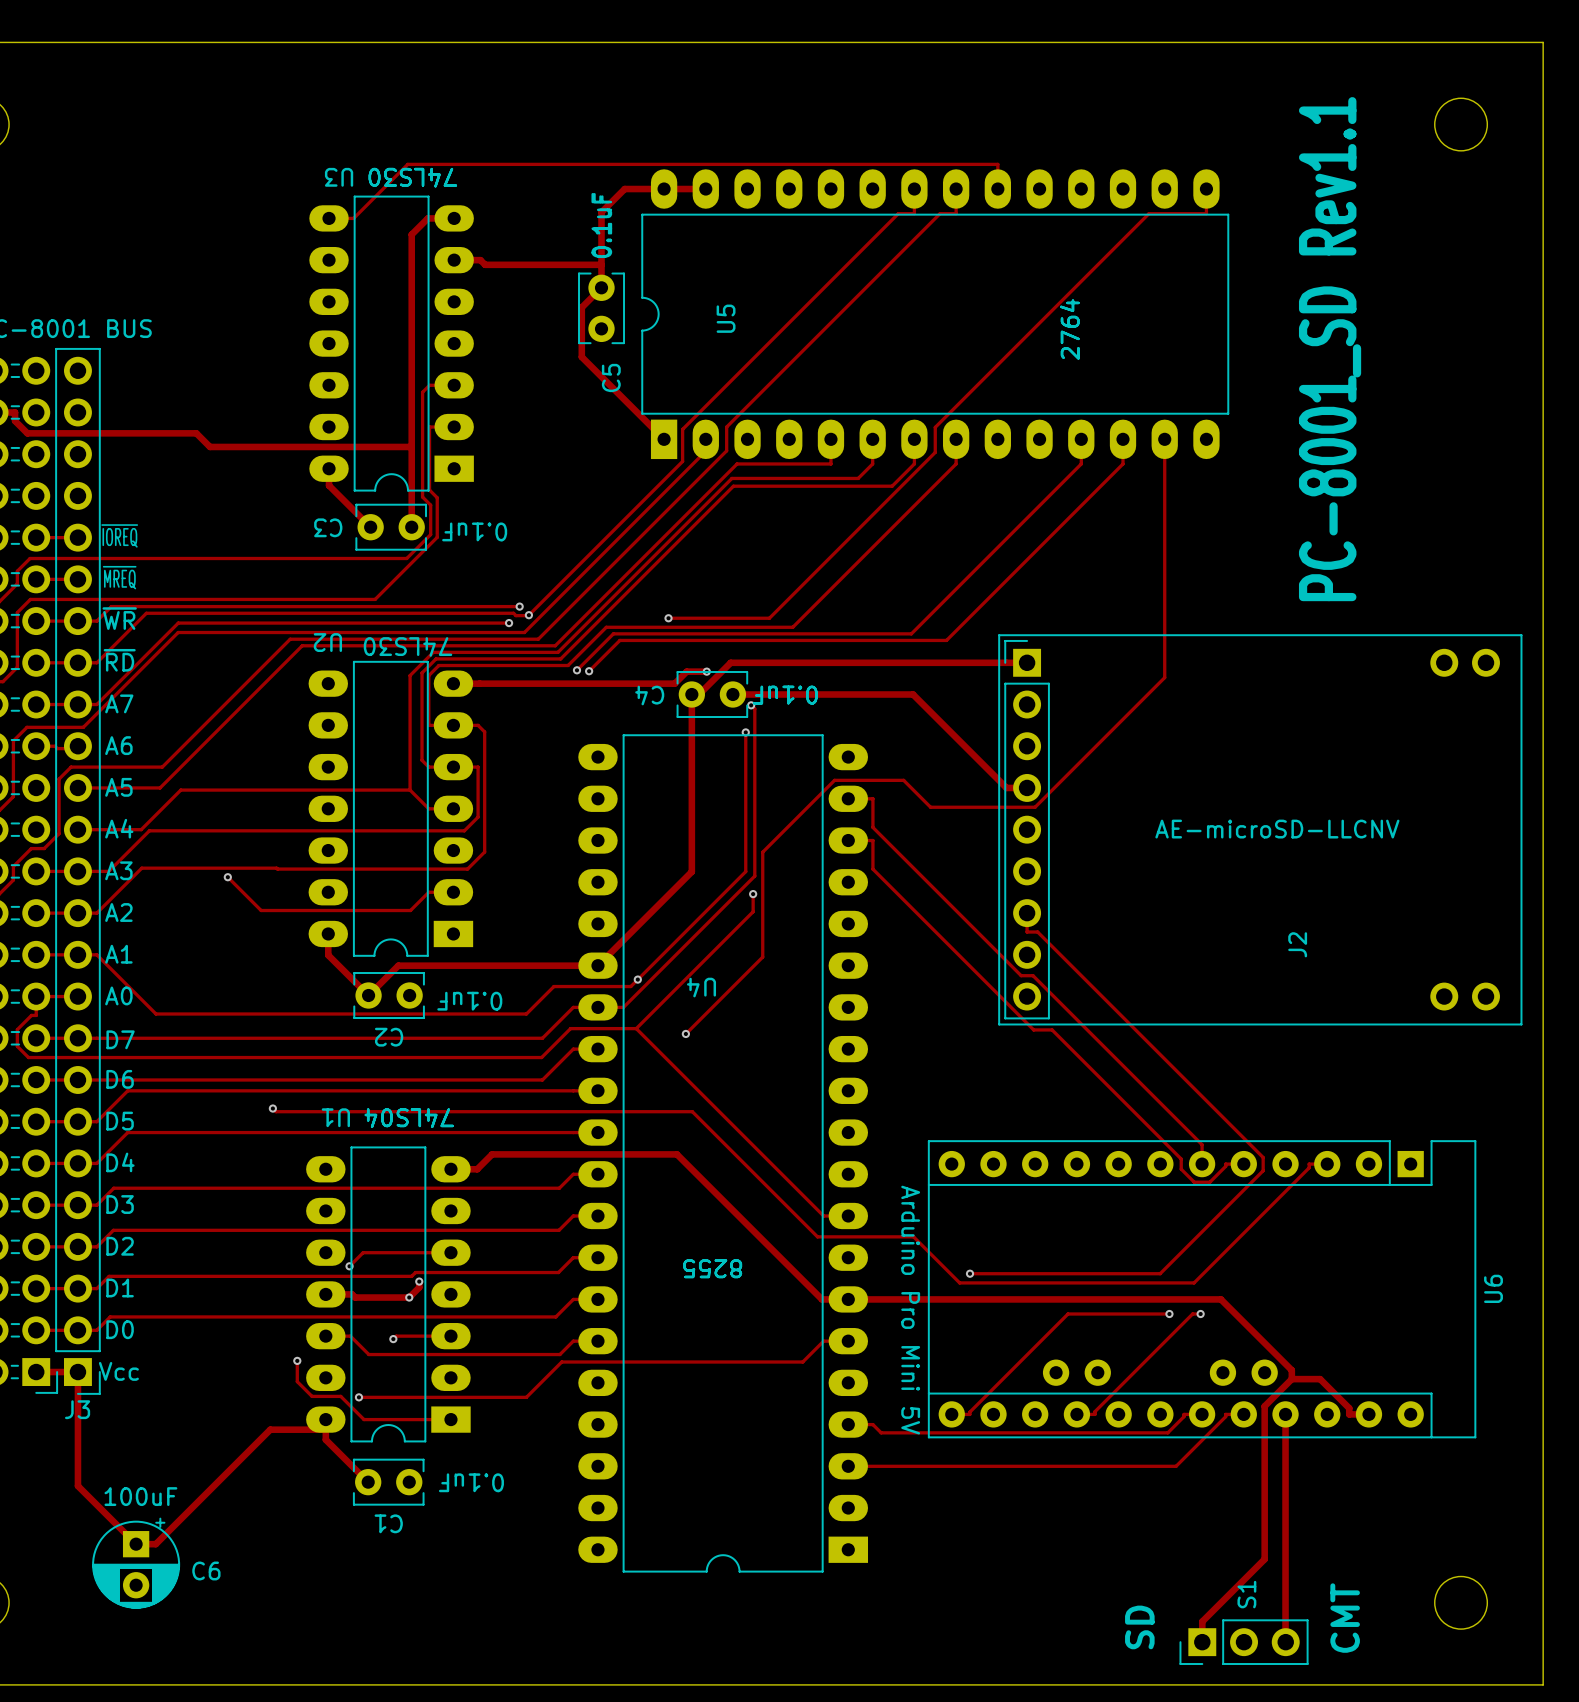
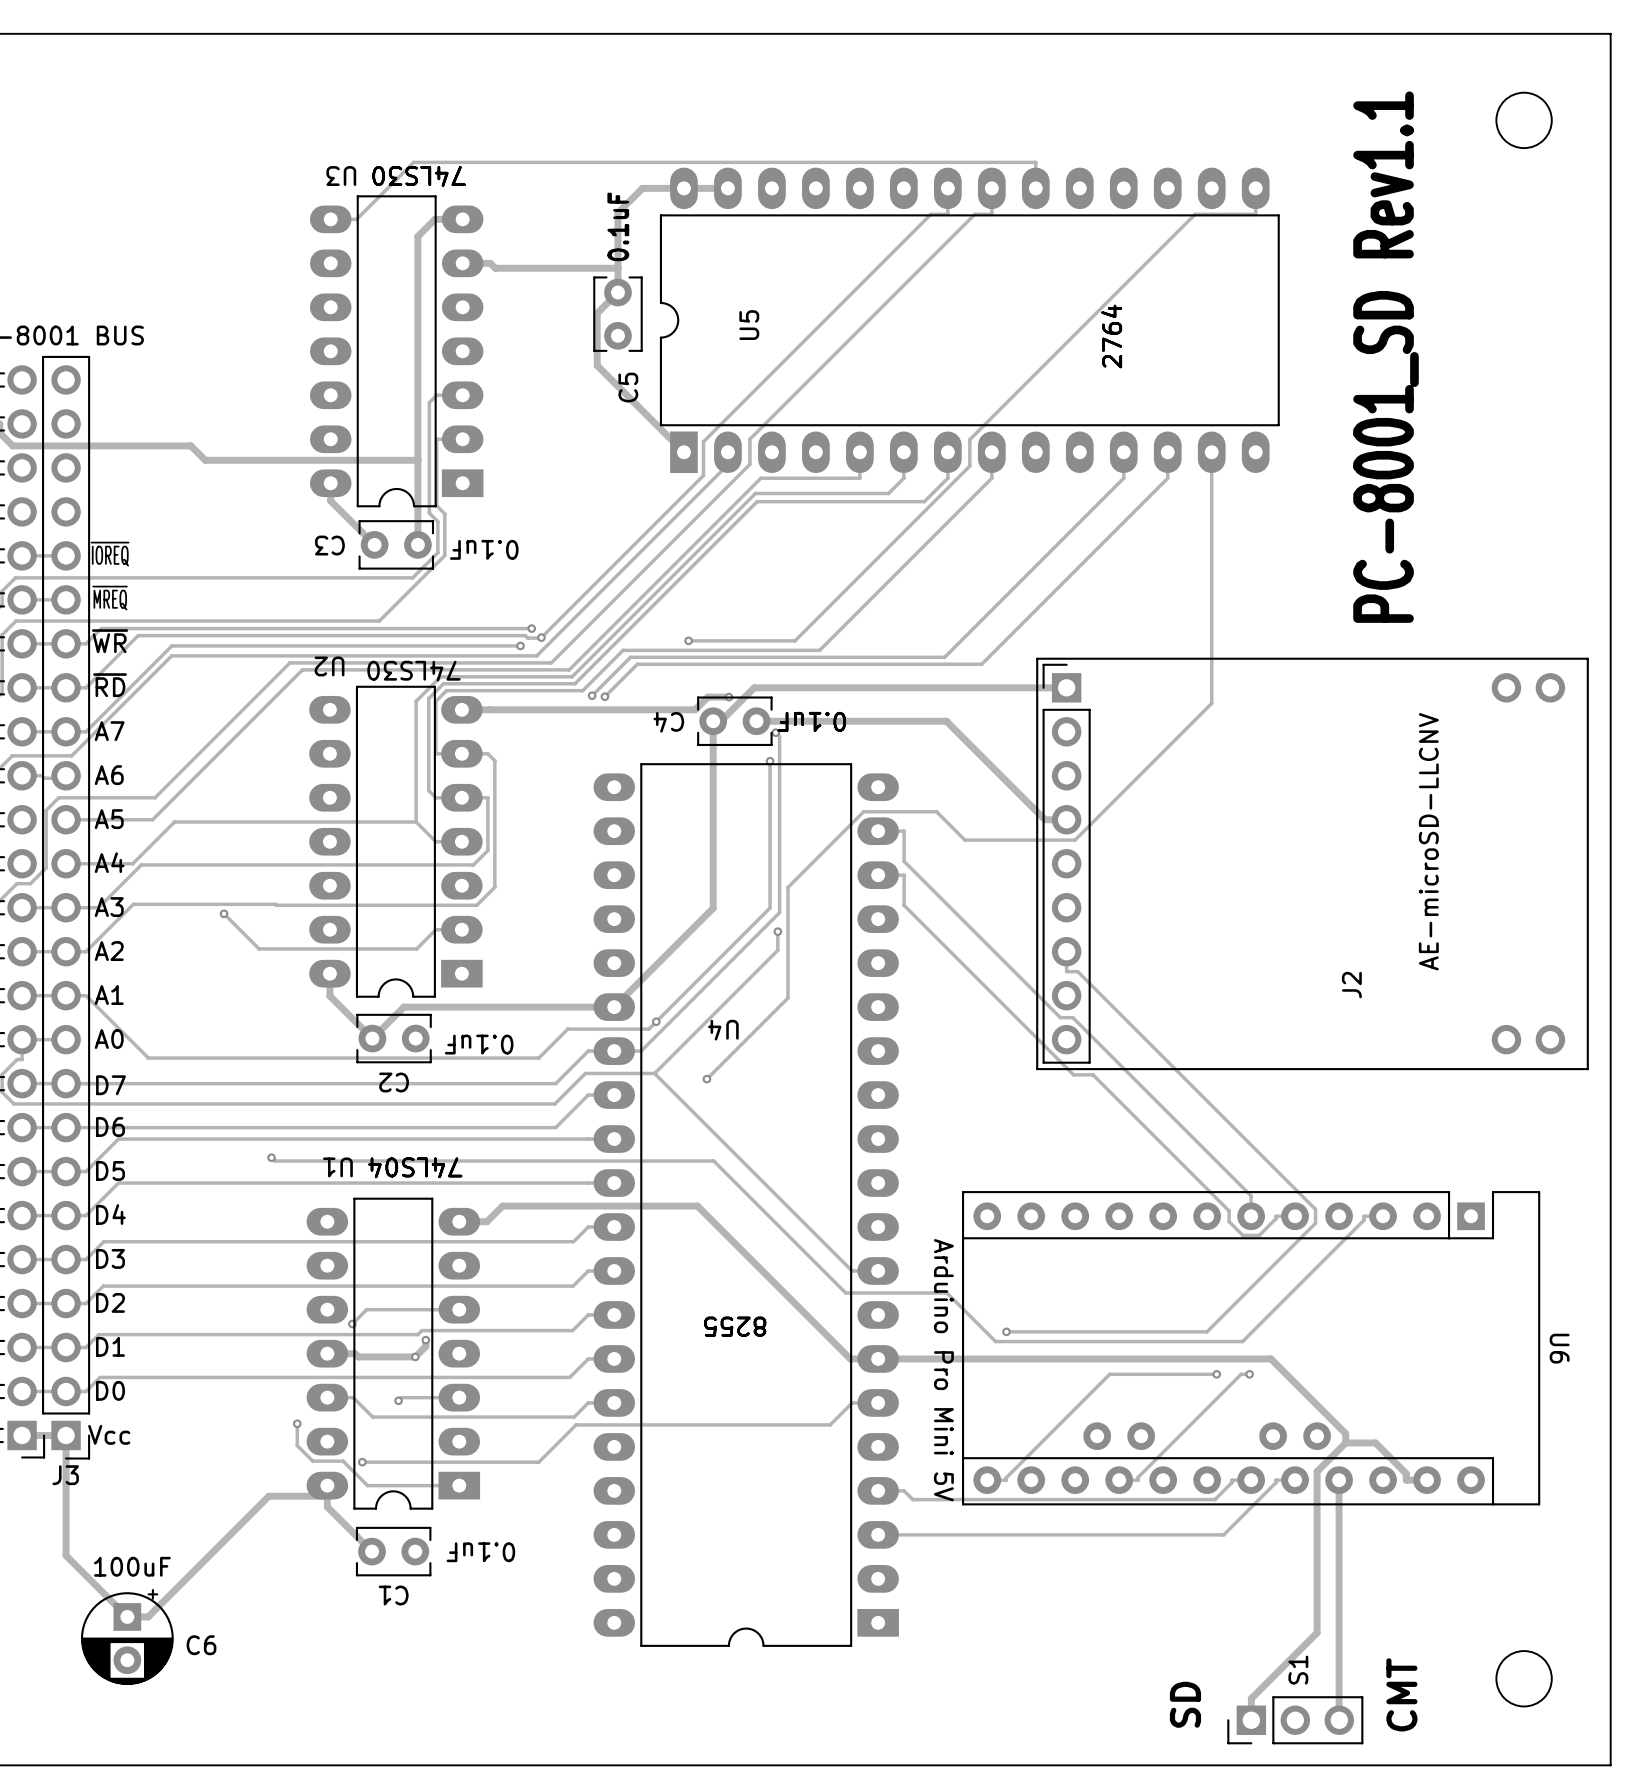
J2 text rotation: 0° (1277, 829) -> 90° counterclockwise (1428, 841)
U6 name rotation: 0° (1493, 1288) -> 180° (1559, 1348)

